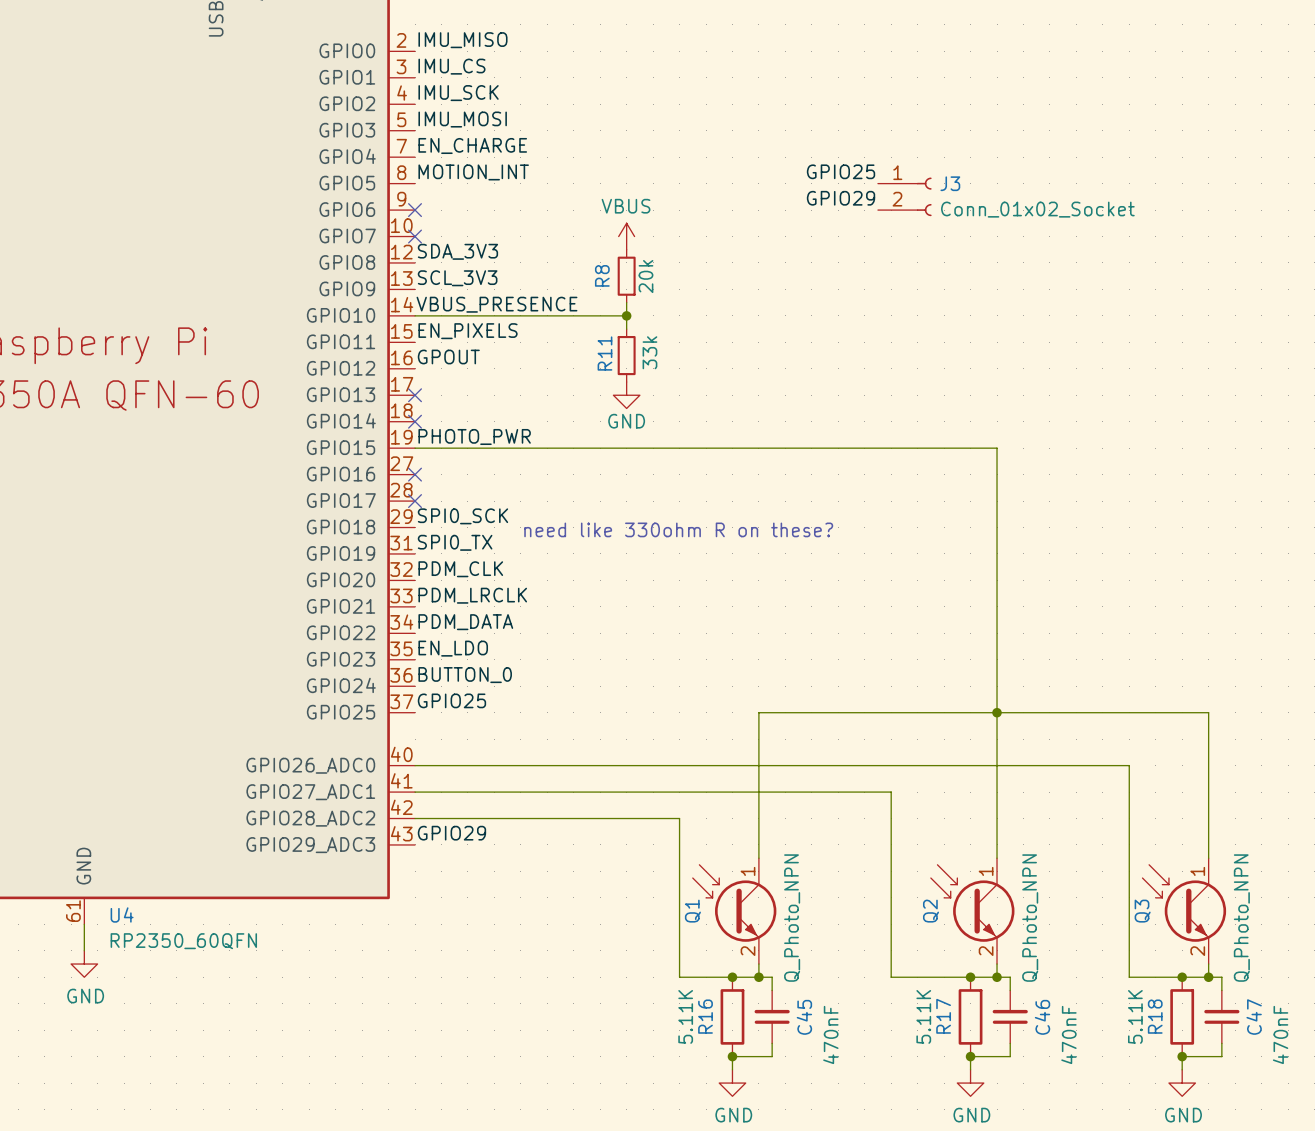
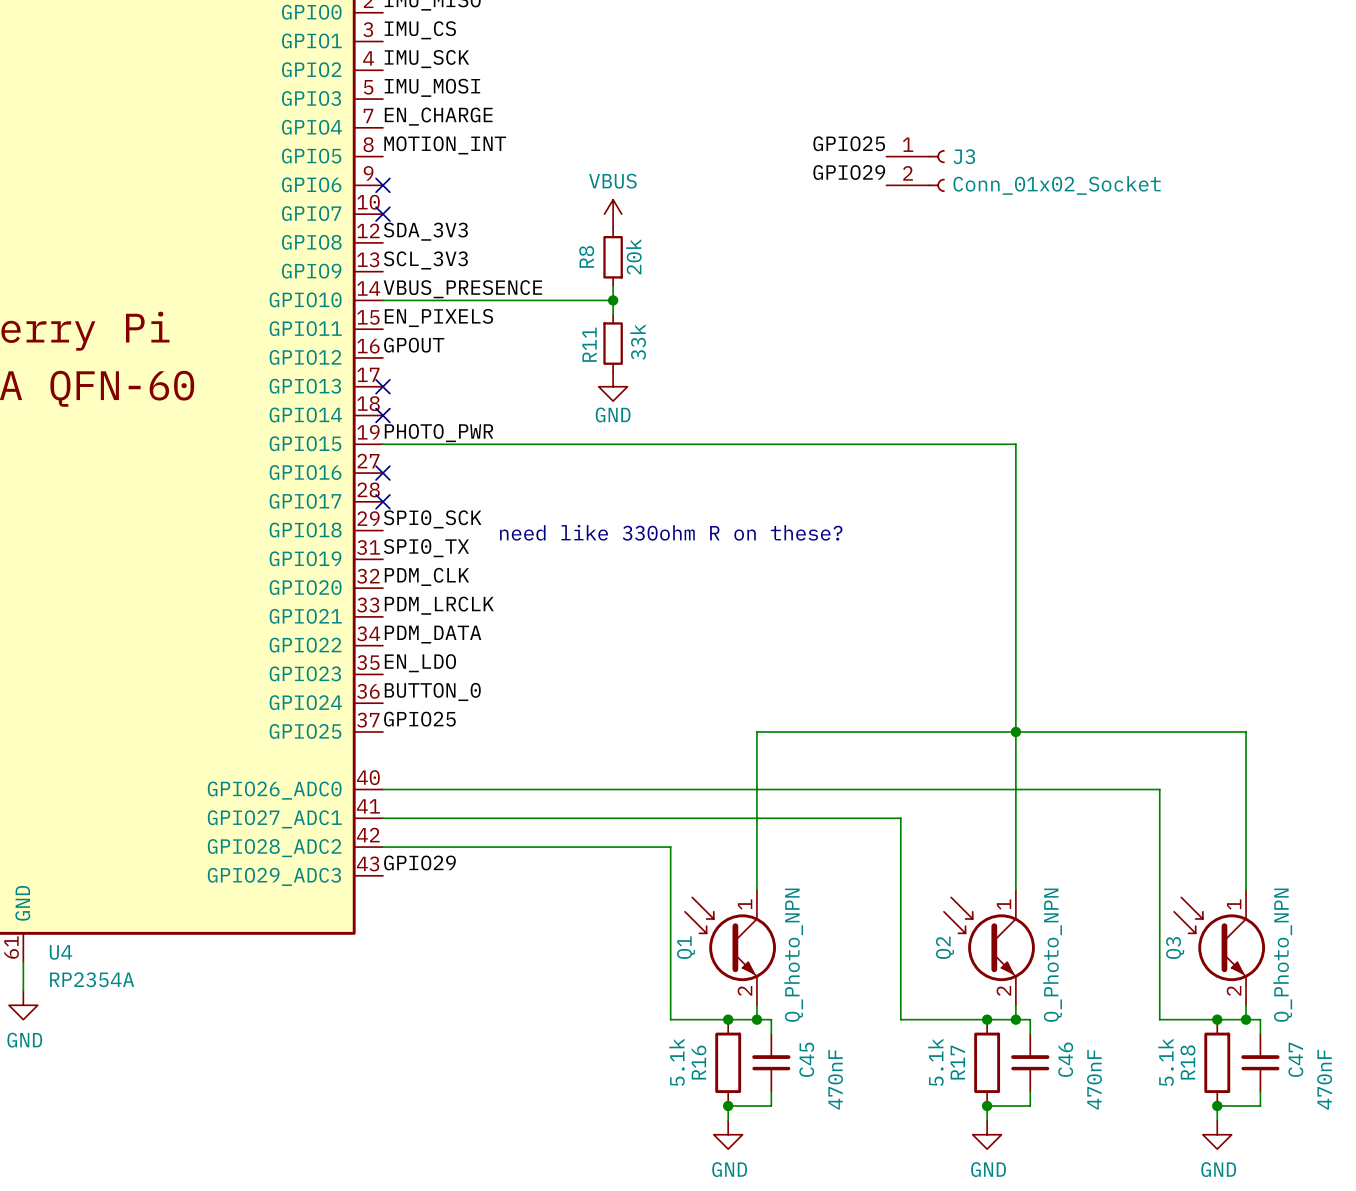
U4 value: RP2350_60QFN (183, 941) -> RP2354A (92, 979)
R16 value: 5.11K (685, 1016) -> 5.1k (677, 1062)
R17 value: 5.11K (923, 1016) -> 5.1k (935, 1062)
R18 value: 5.11K (1135, 1016) -> 5.1k (1166, 1062)

